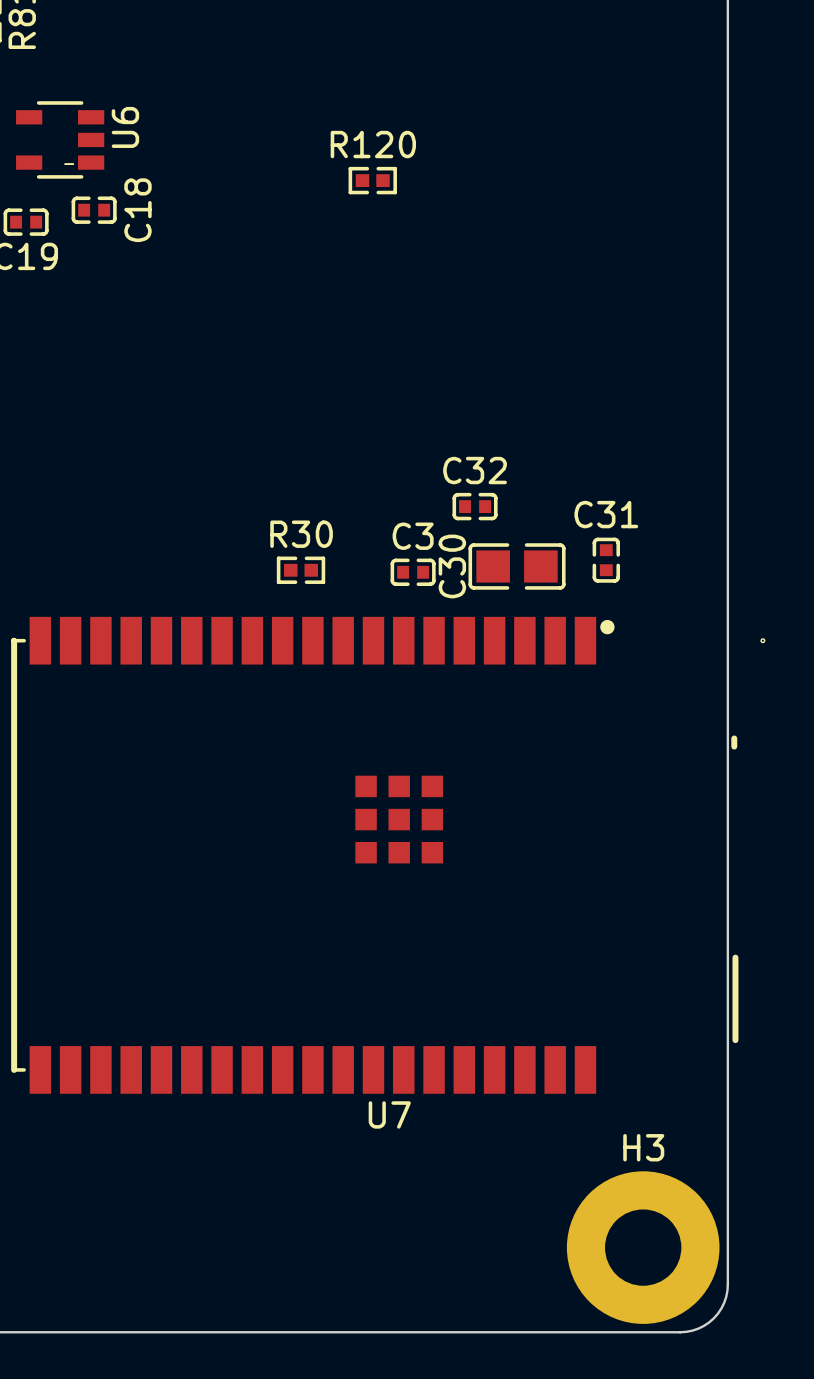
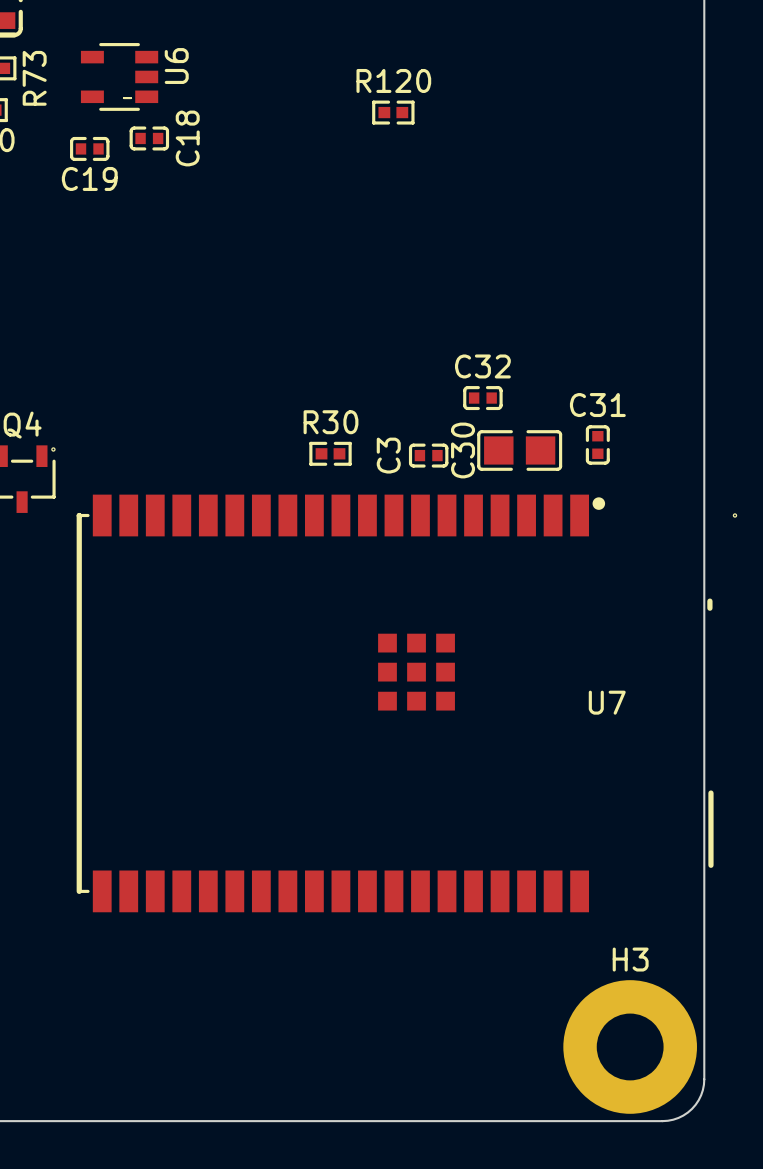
C3 name rotation: 0° (413, 536) -> 90° counterclockwise (388, 455)
U7 name position: U7 (389, 1114) -> U7 (607, 702)

